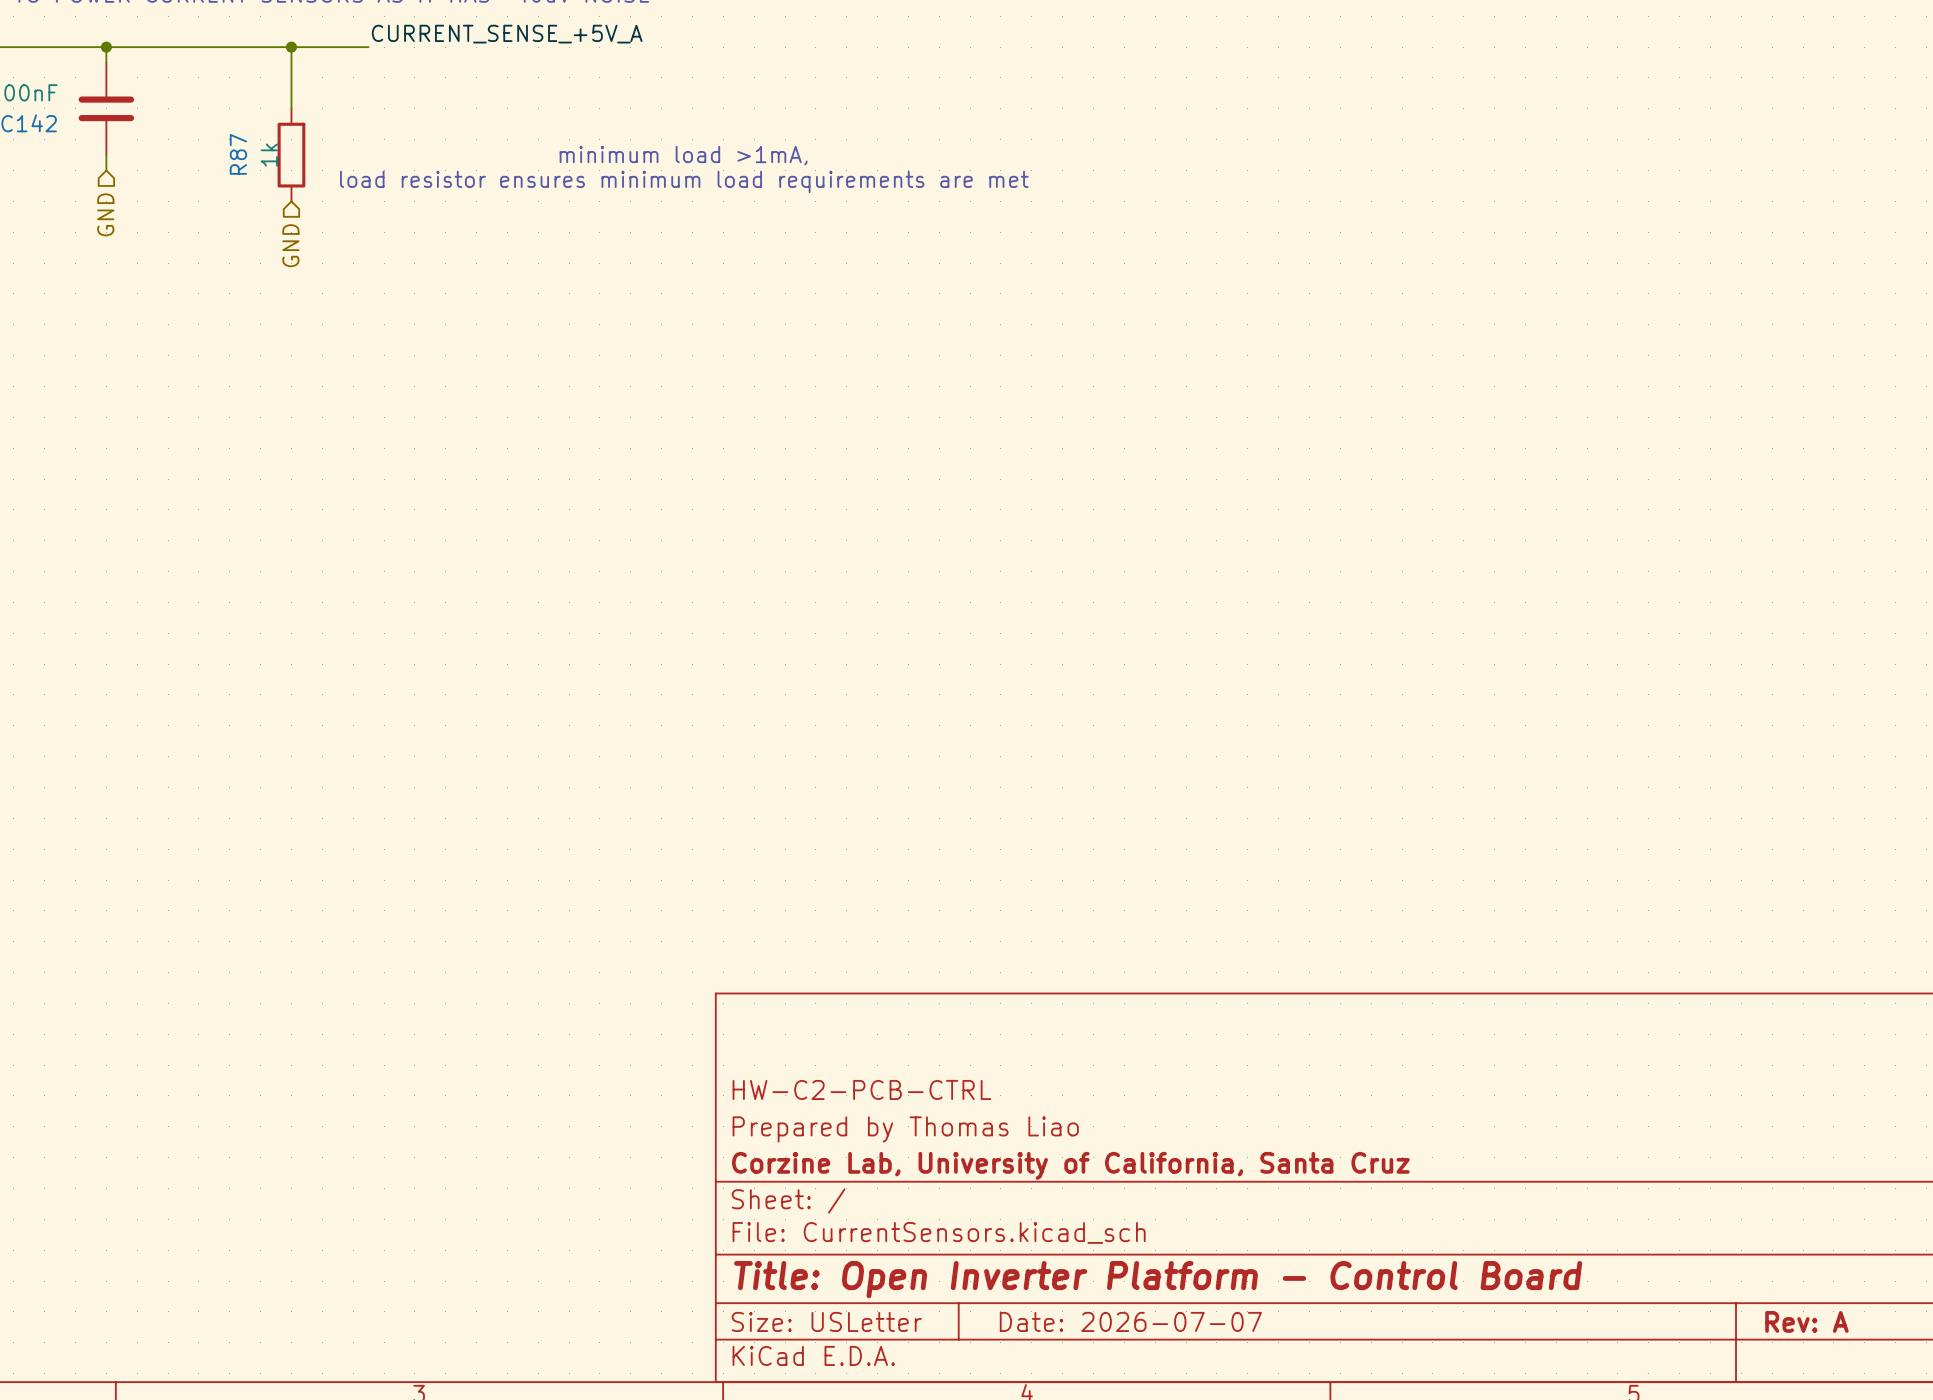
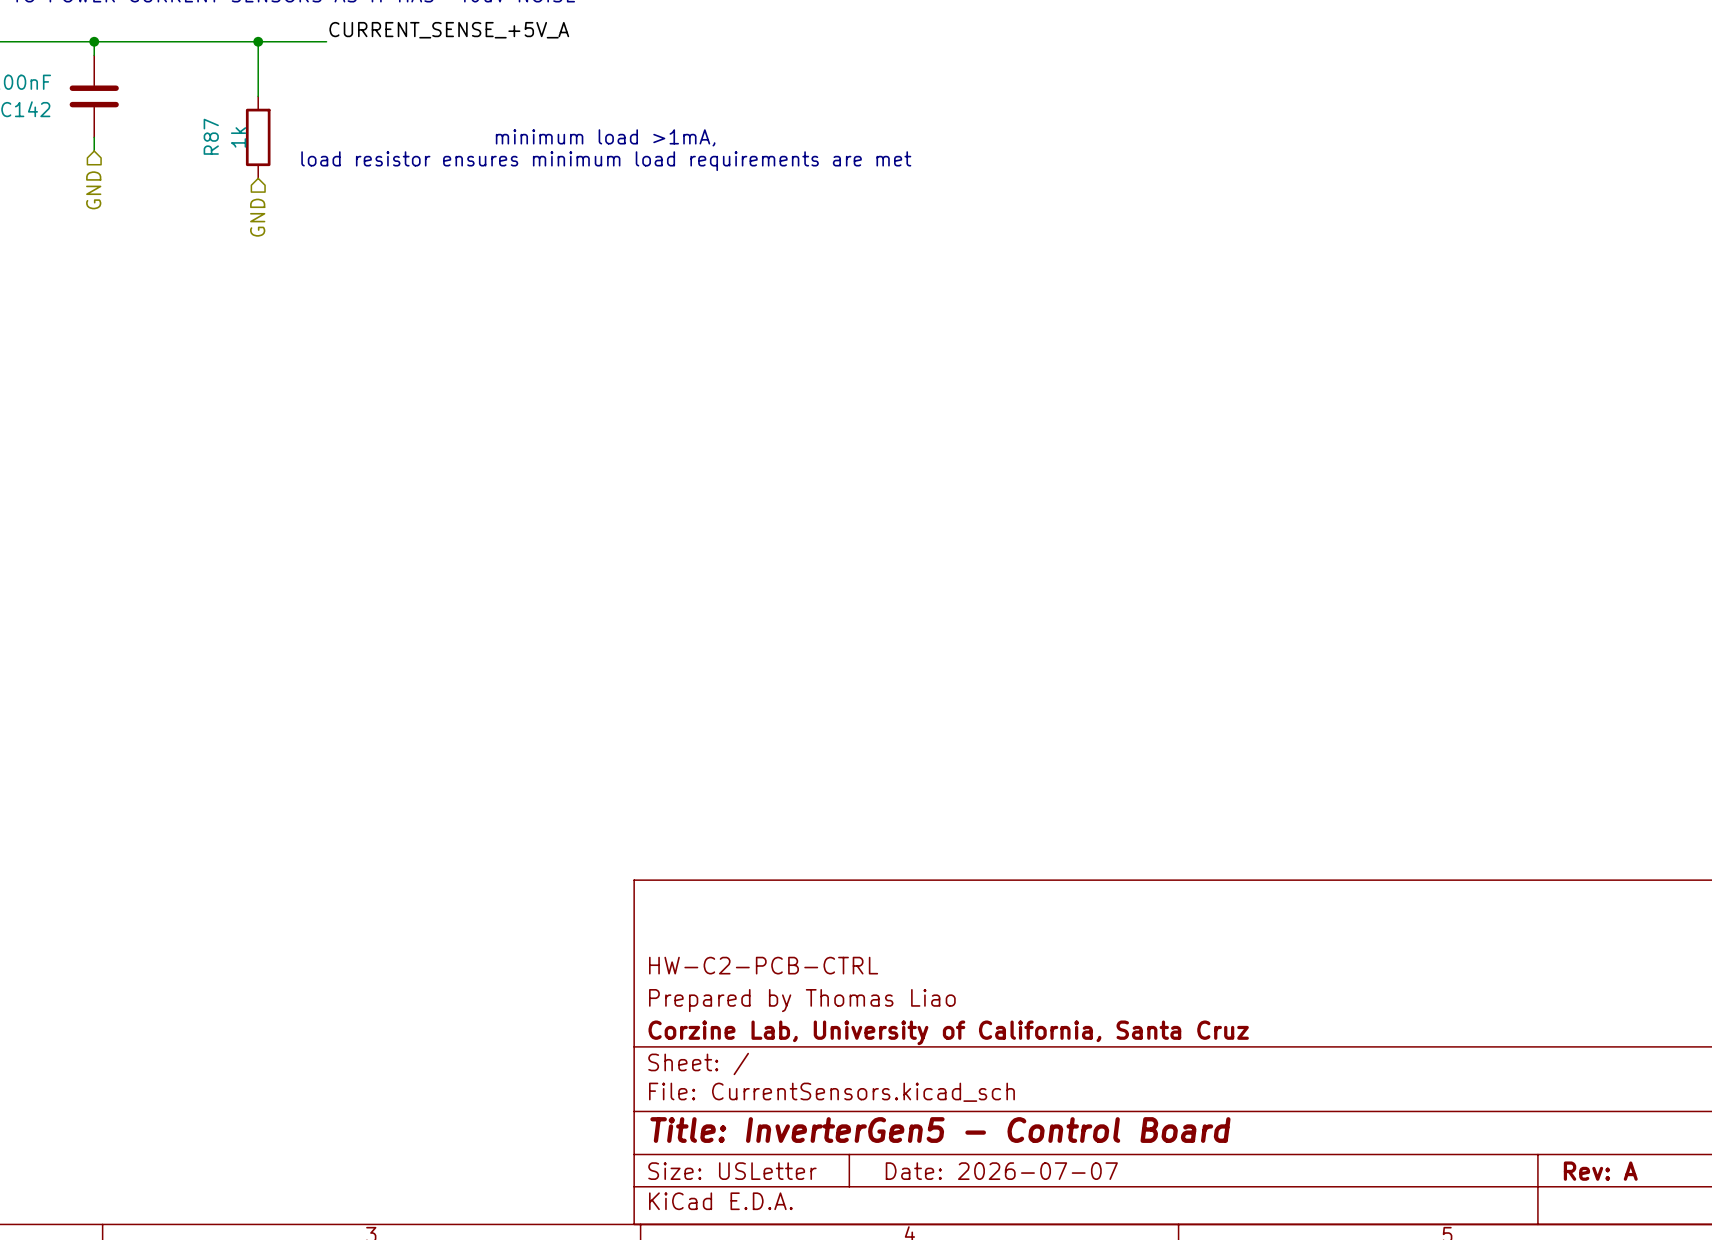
title block: Title: Open Inverter Platform - Control Board (1158, 1279) -> Title: InverterGen5 - Control Board (940, 1130)

